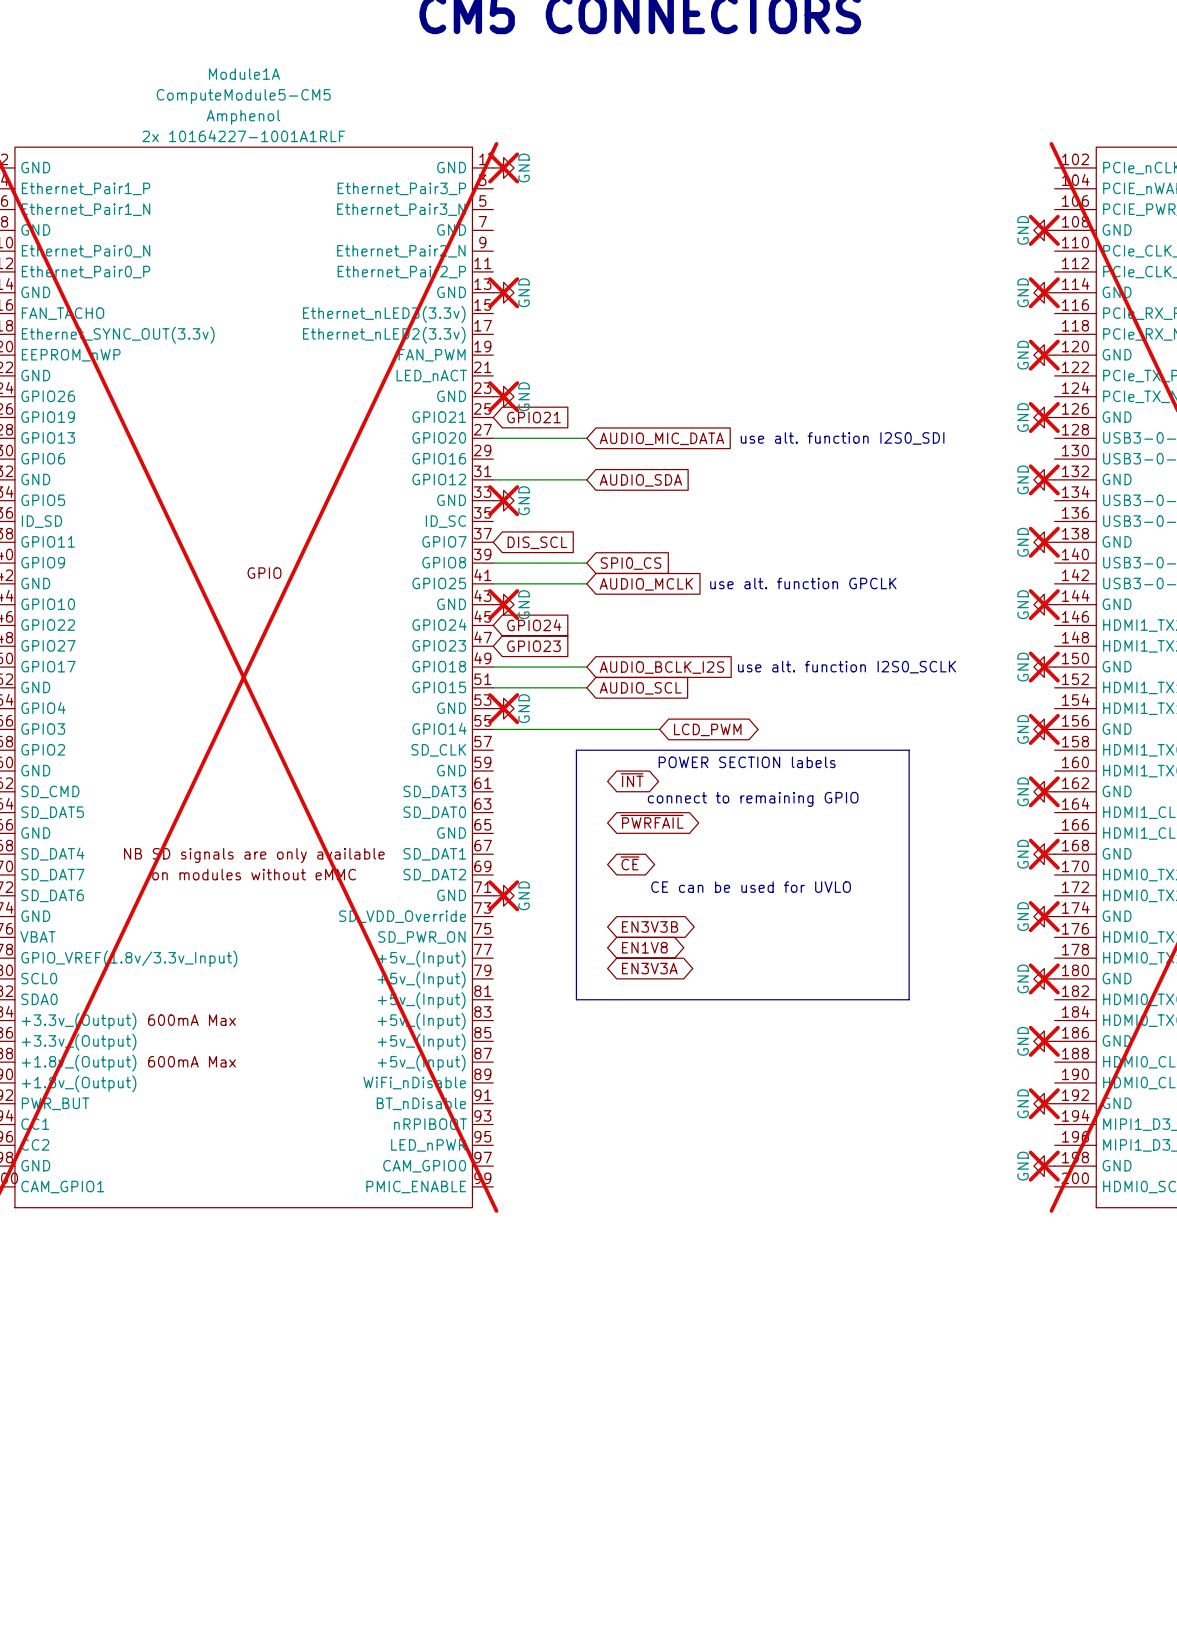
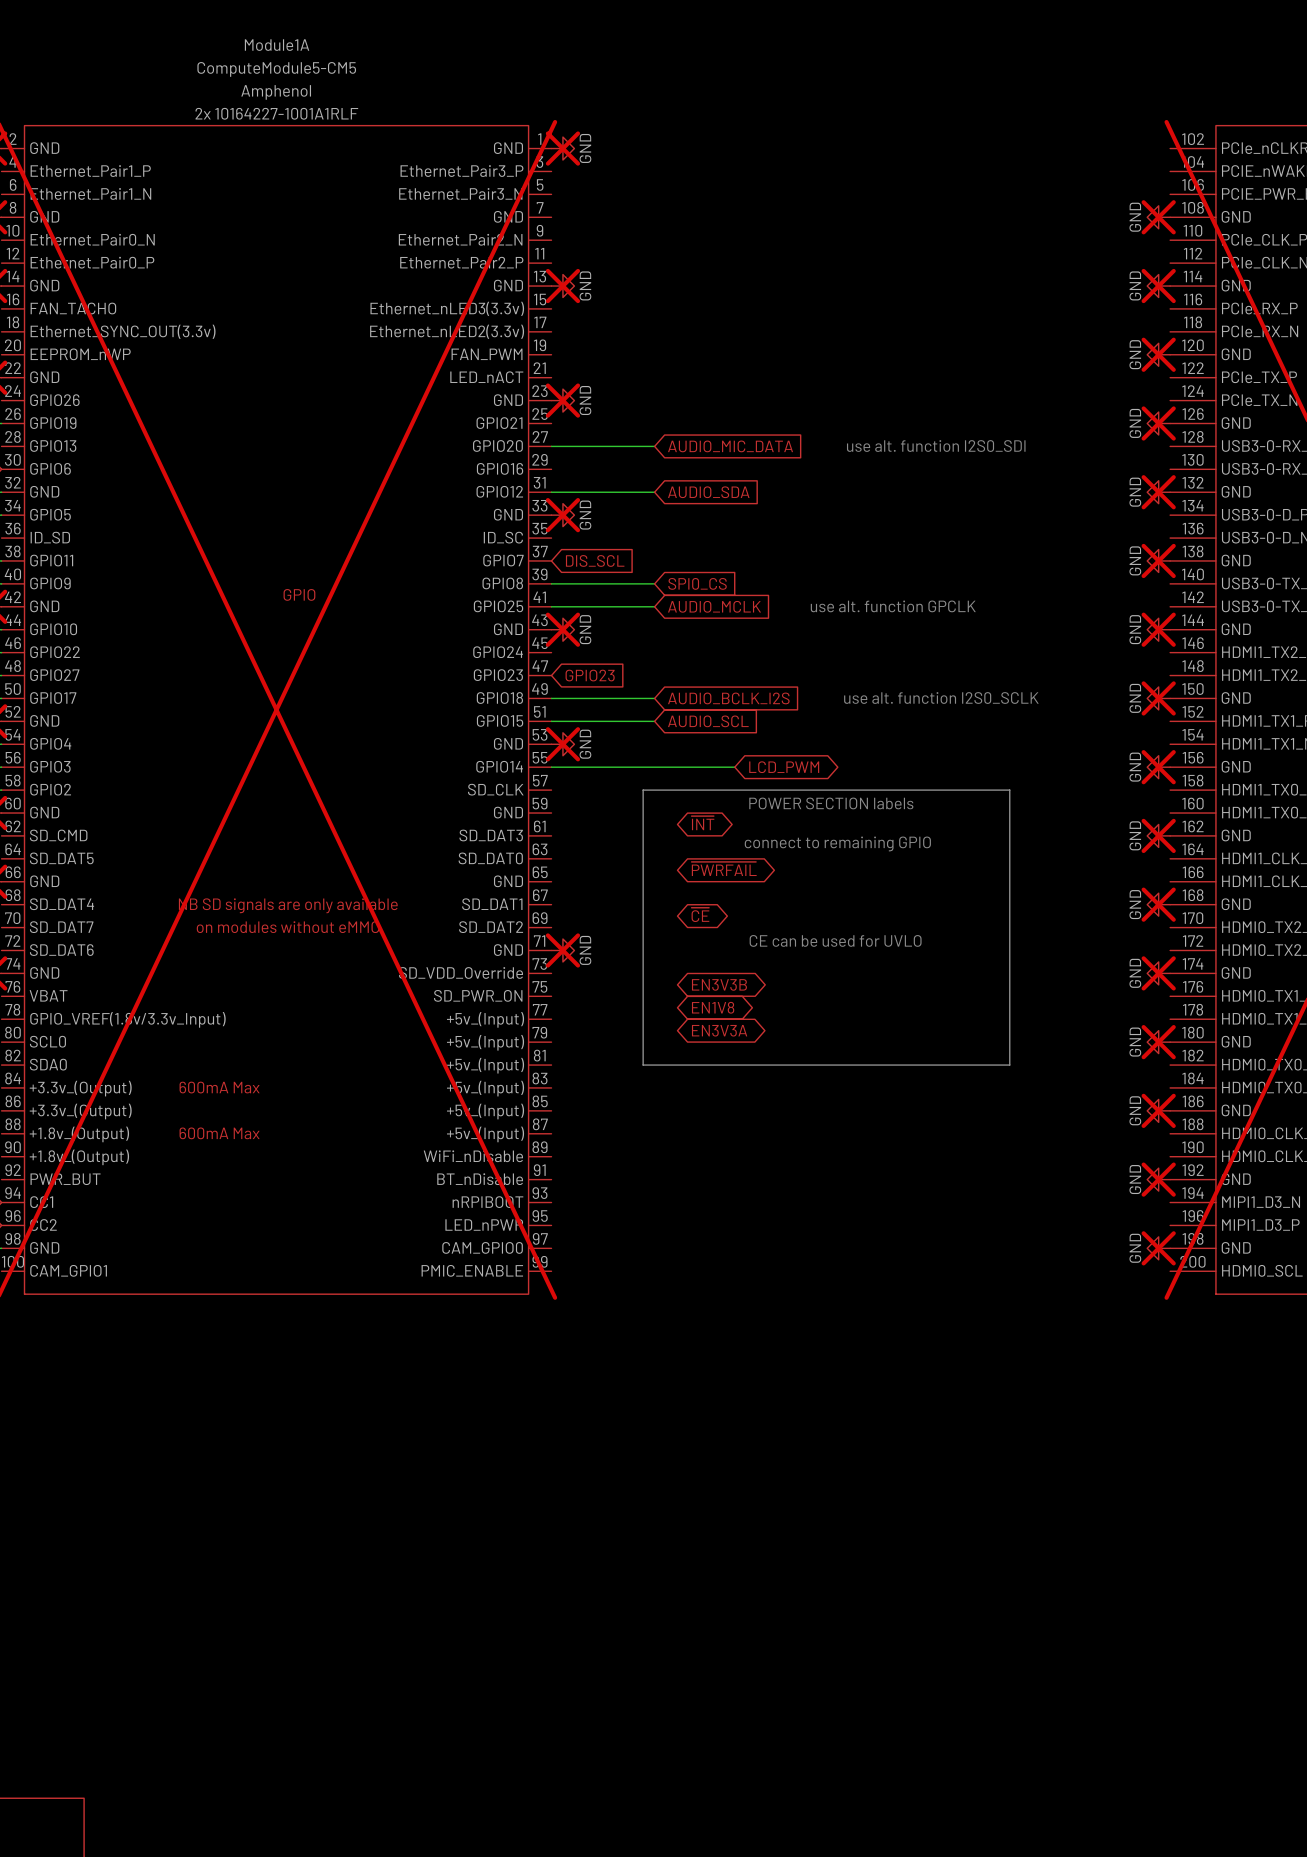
global label: GPIO21 (533, 417) -> none
global label: GPIO24 (534, 625) -> none

